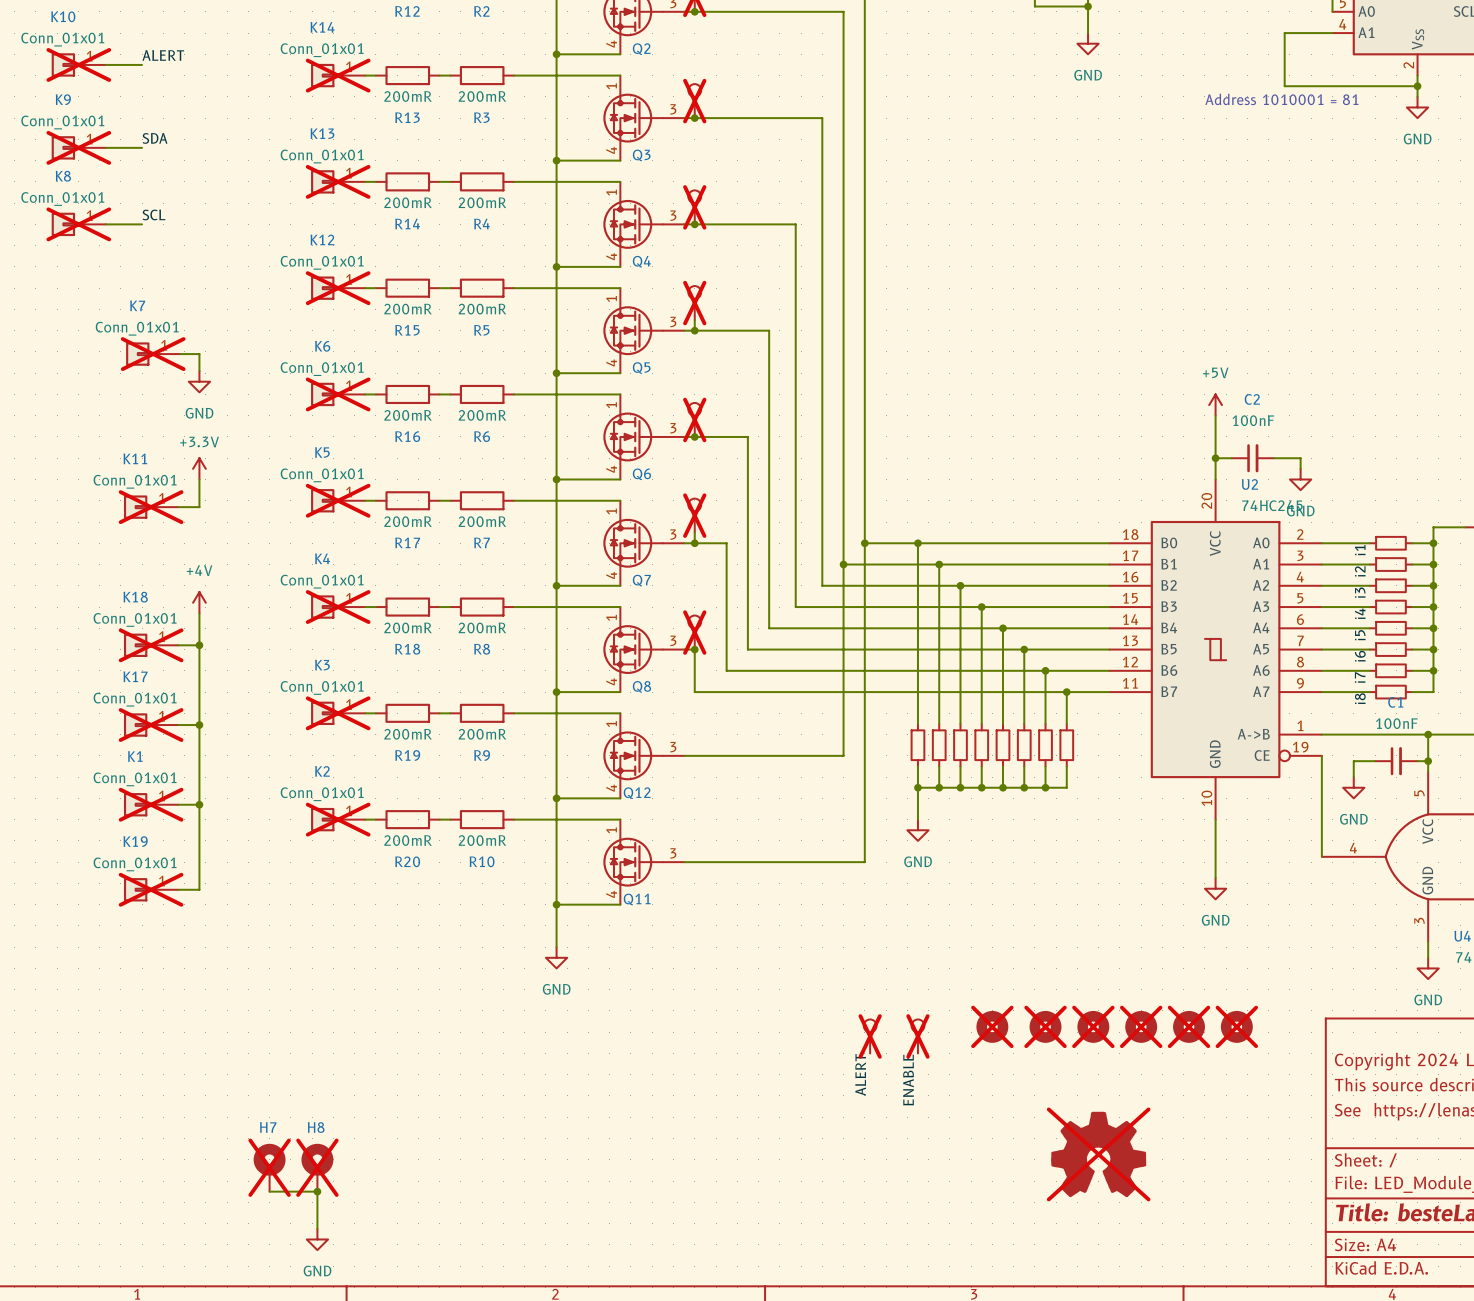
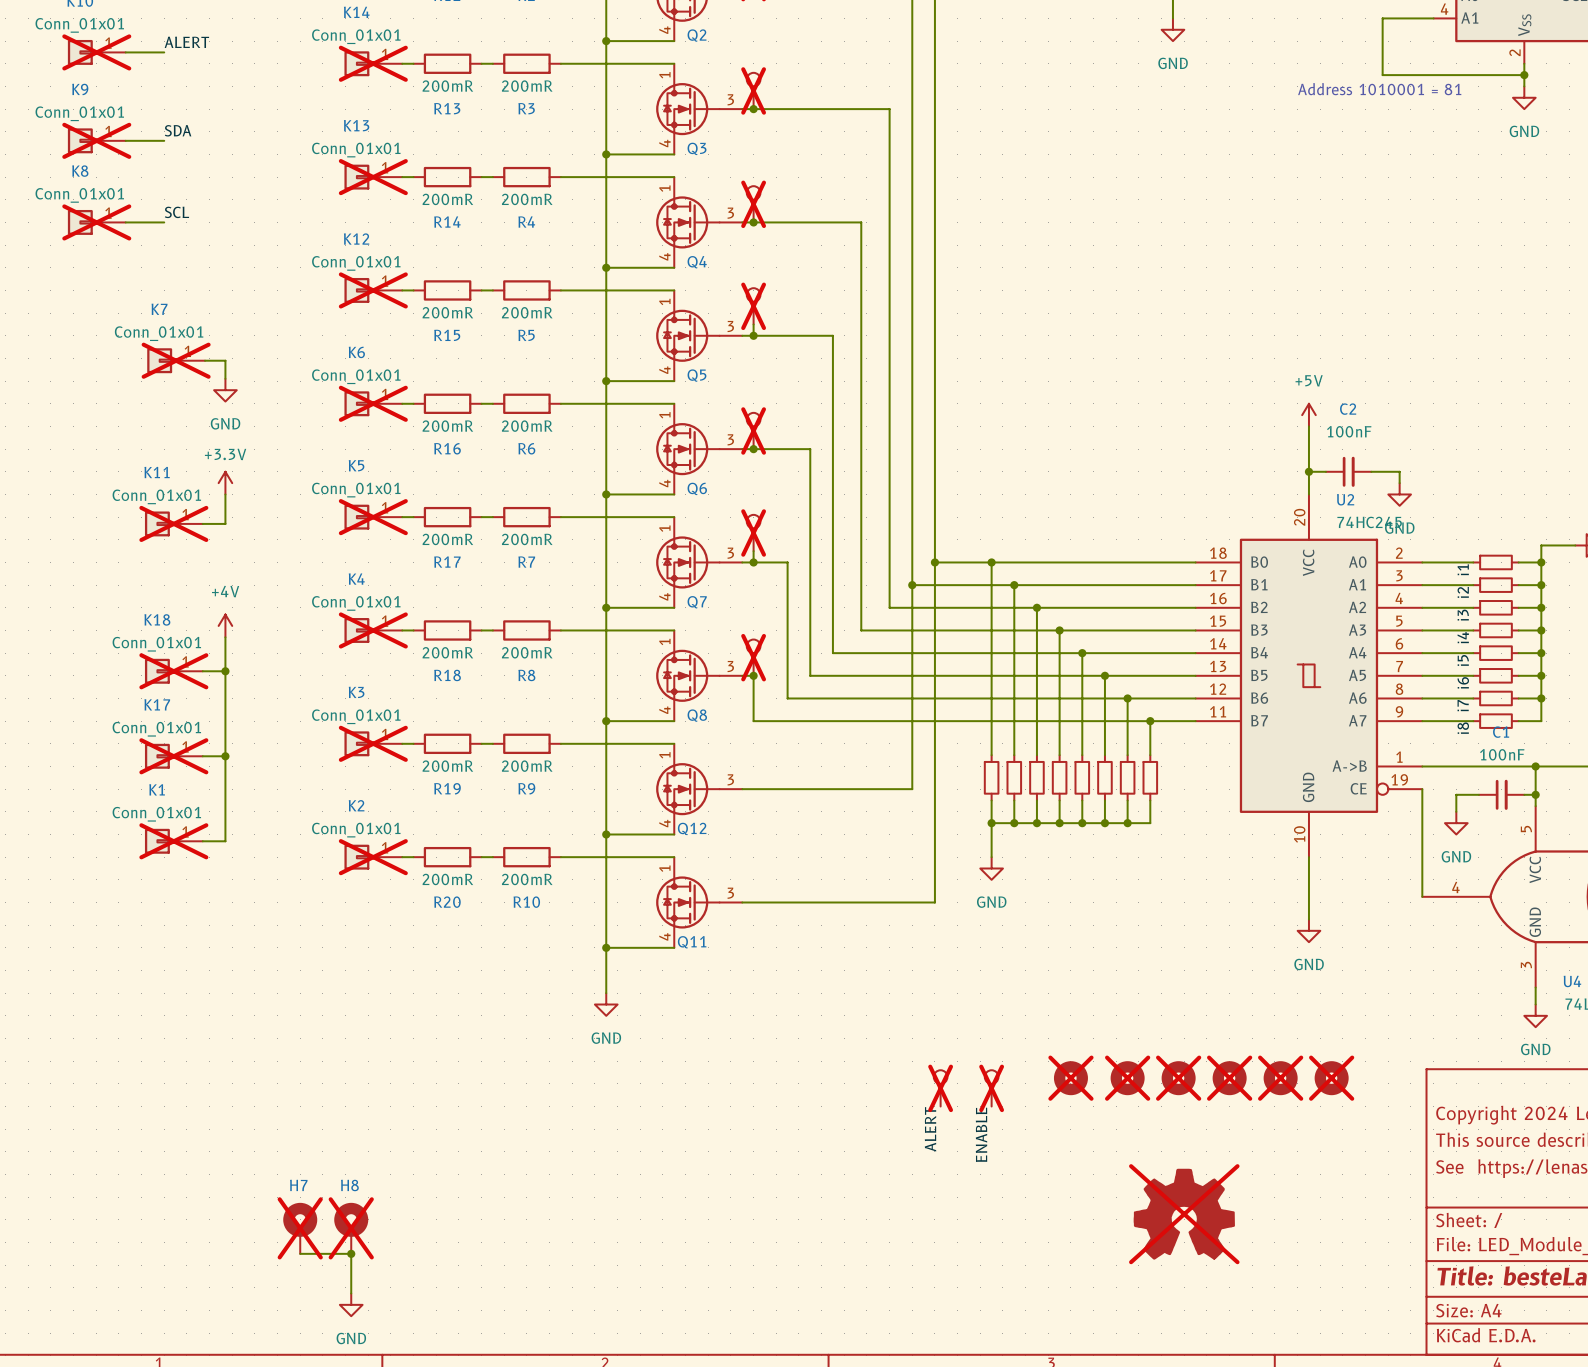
wire: (199, 804) (199, 889) (178, 889) -> none
junction: (199, 804) -> none
K19: Conn_01x01 (151, 889) -> none

